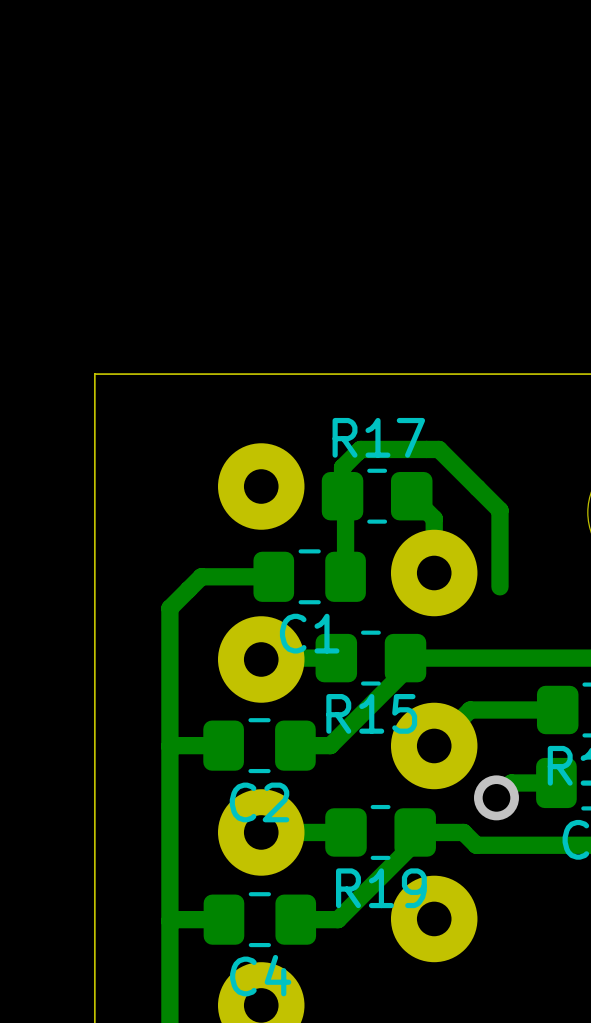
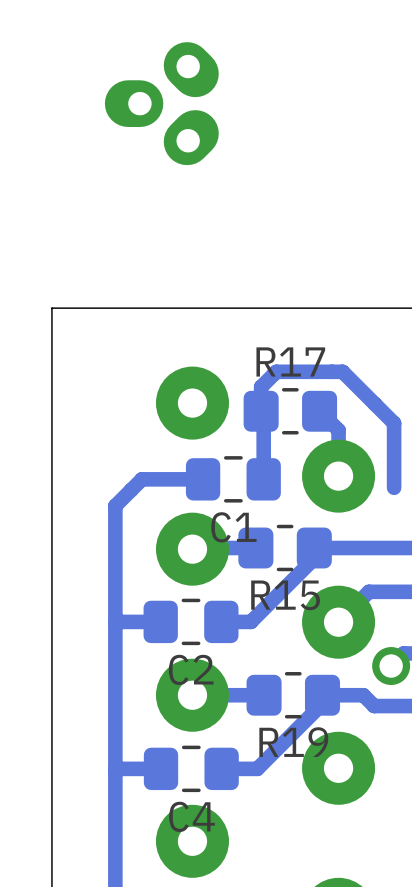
part: none -> (161, 103)

